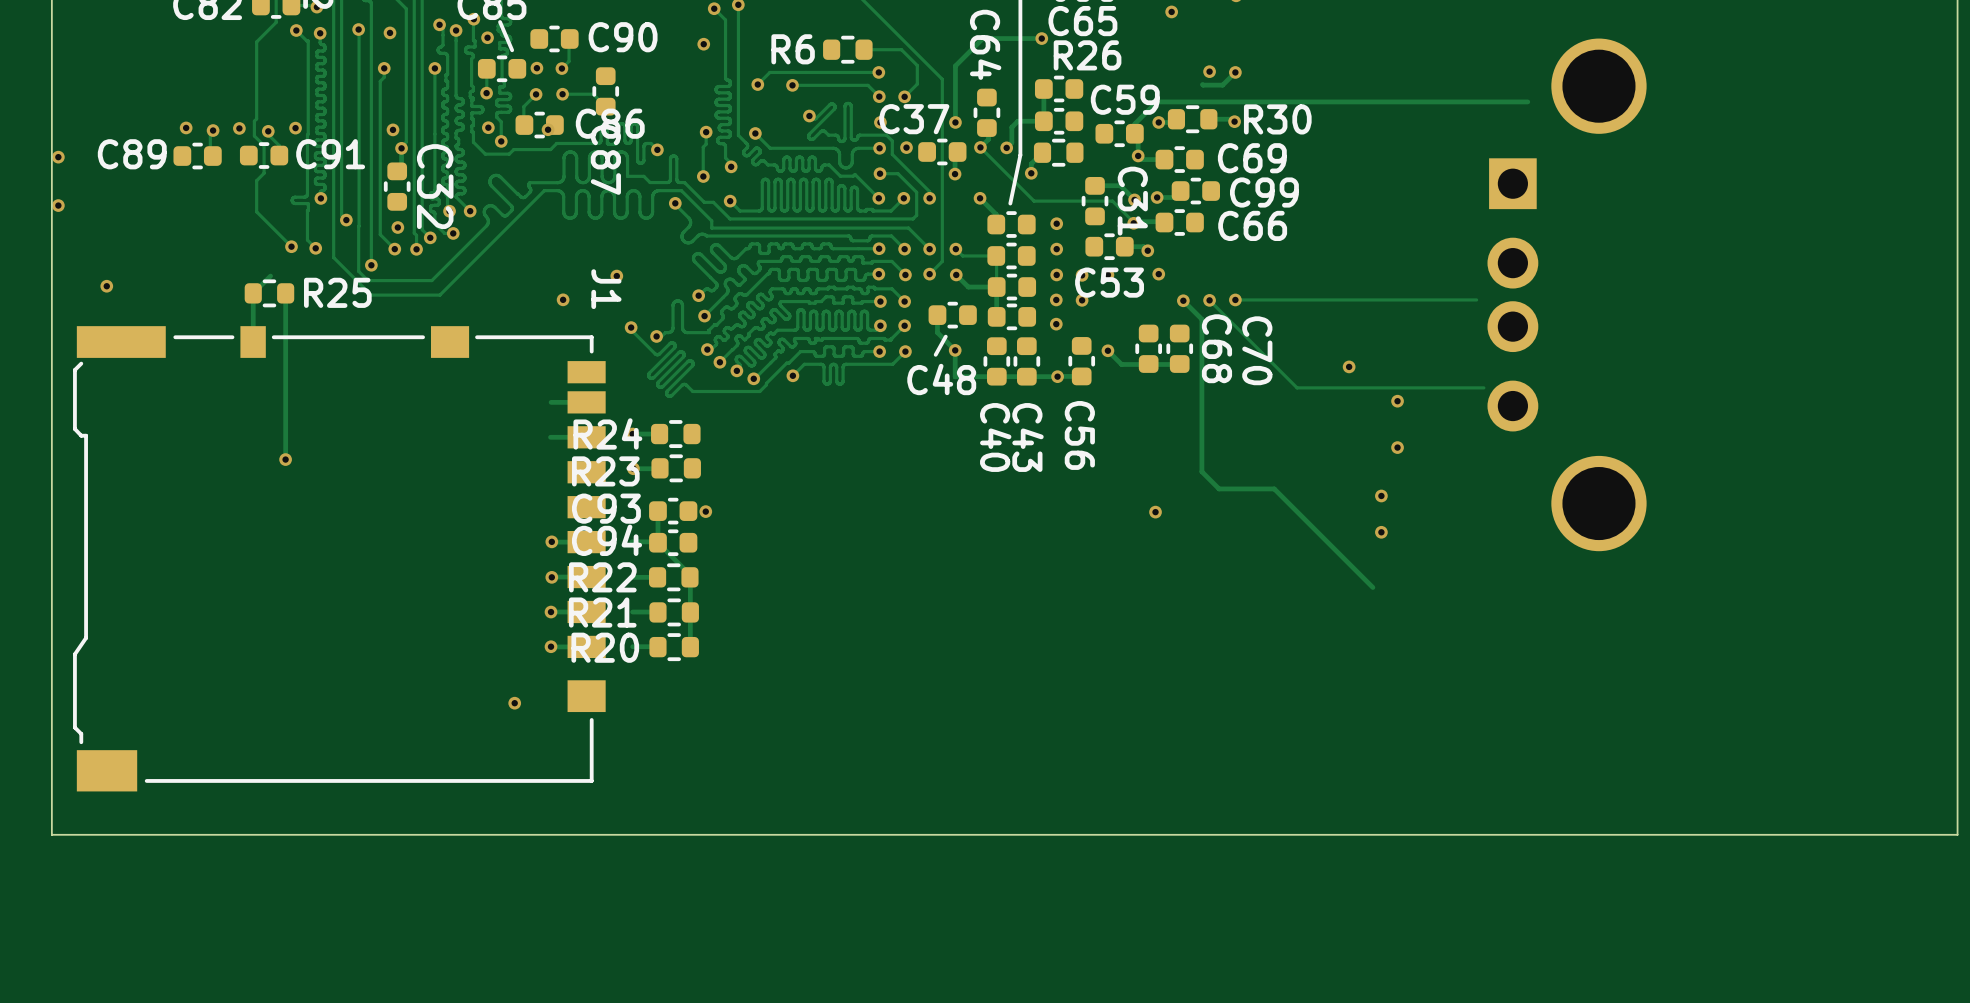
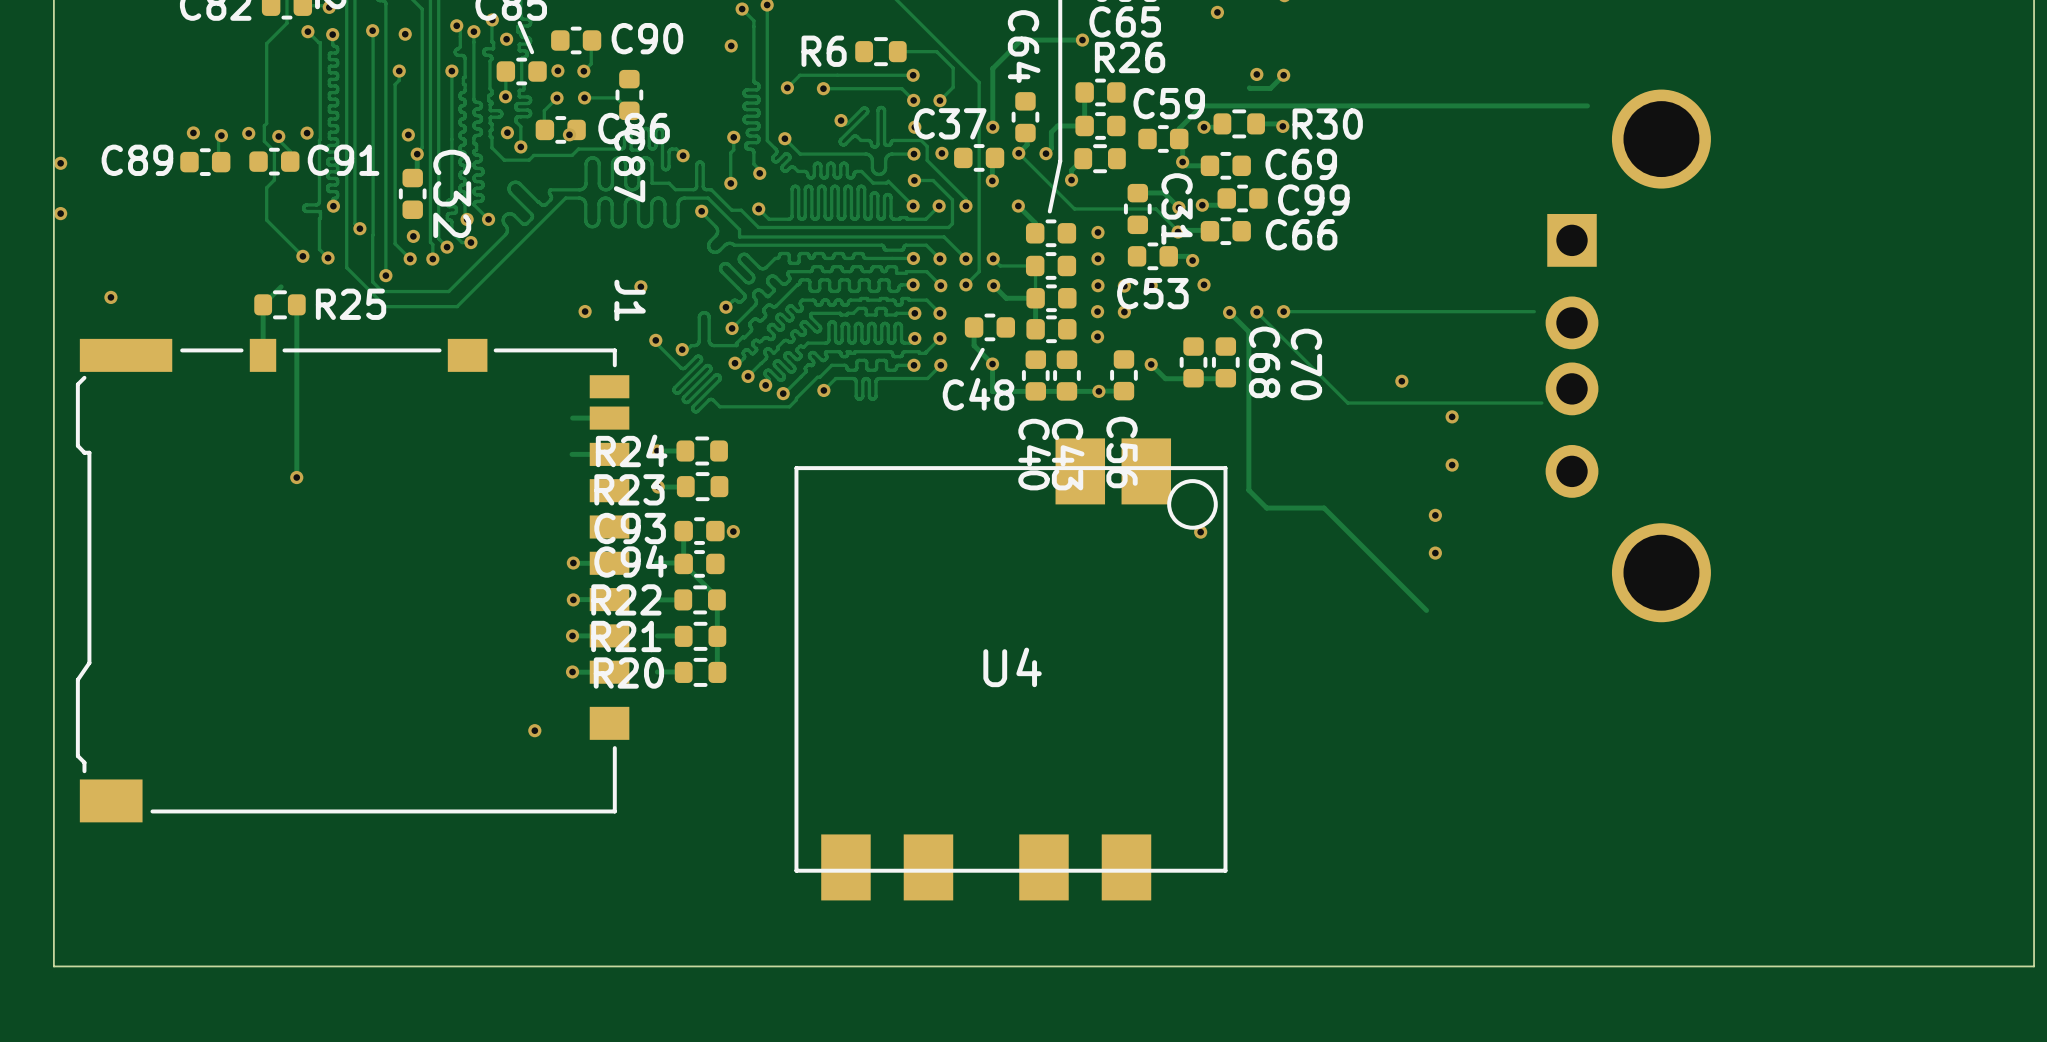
part position: (1567, 294) -> (1628, 355)
U4: none -> (1010, 669)
board edge: (1957, 834) (51, 834) -> (2034, 867) (2034, 966) (53, 966) (53, 867)

